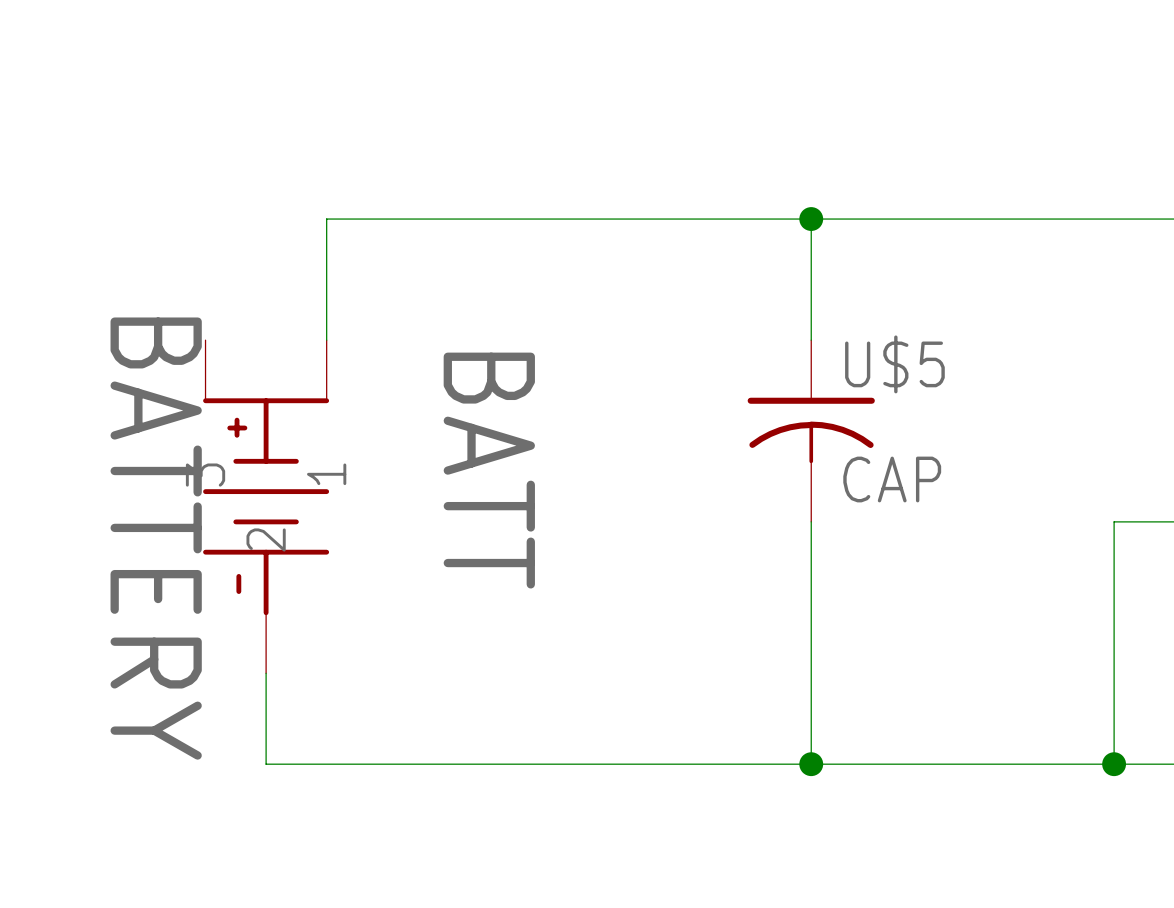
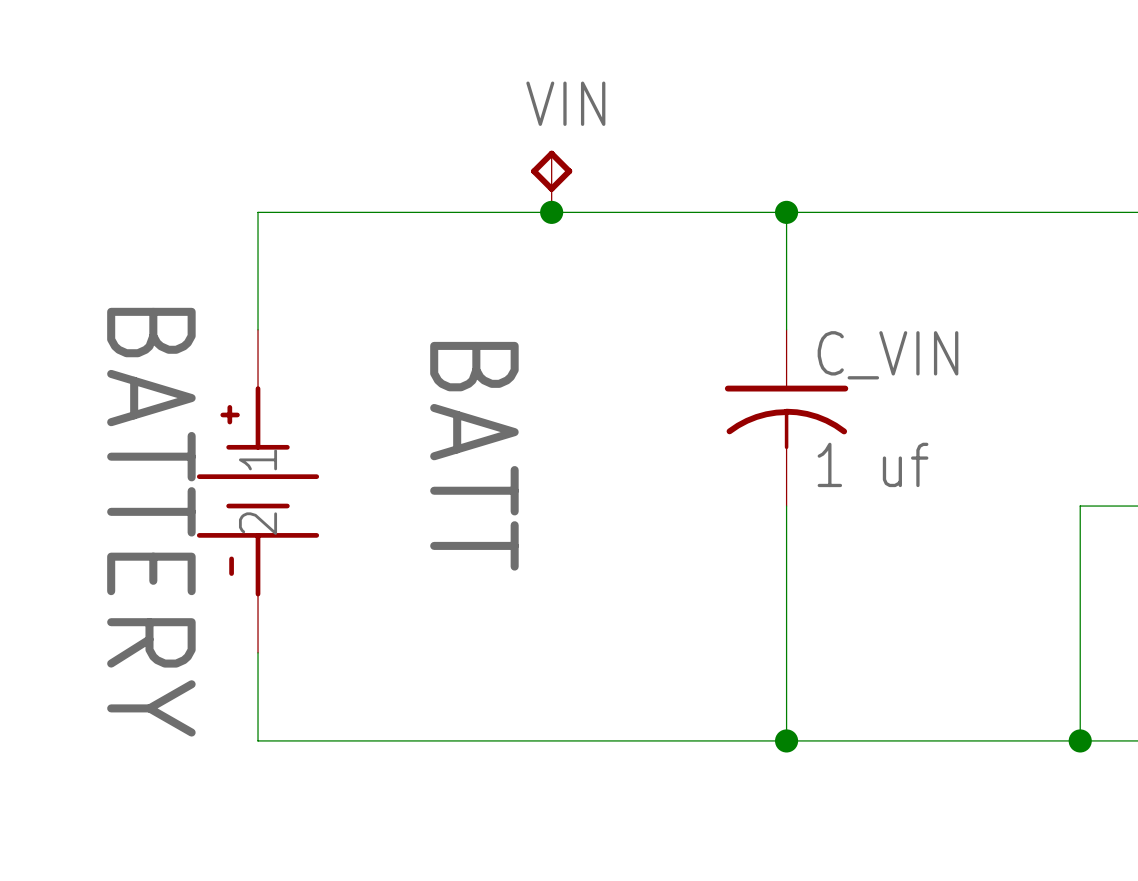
VIN: none -> (551, 181)
wire: (326, 219) (326, 340) -> (316, 212) (258, 212) (258, 329)
junction: none -> (551, 212)
BATT symbol: [203, 340, 330, 674] -> [196, 329, 320, 653]
U$5 name: U$5 (894, 364) -> C_VIN (887, 355)
U$5 value: CAP (892, 479) -> 1 uf (873, 464)

